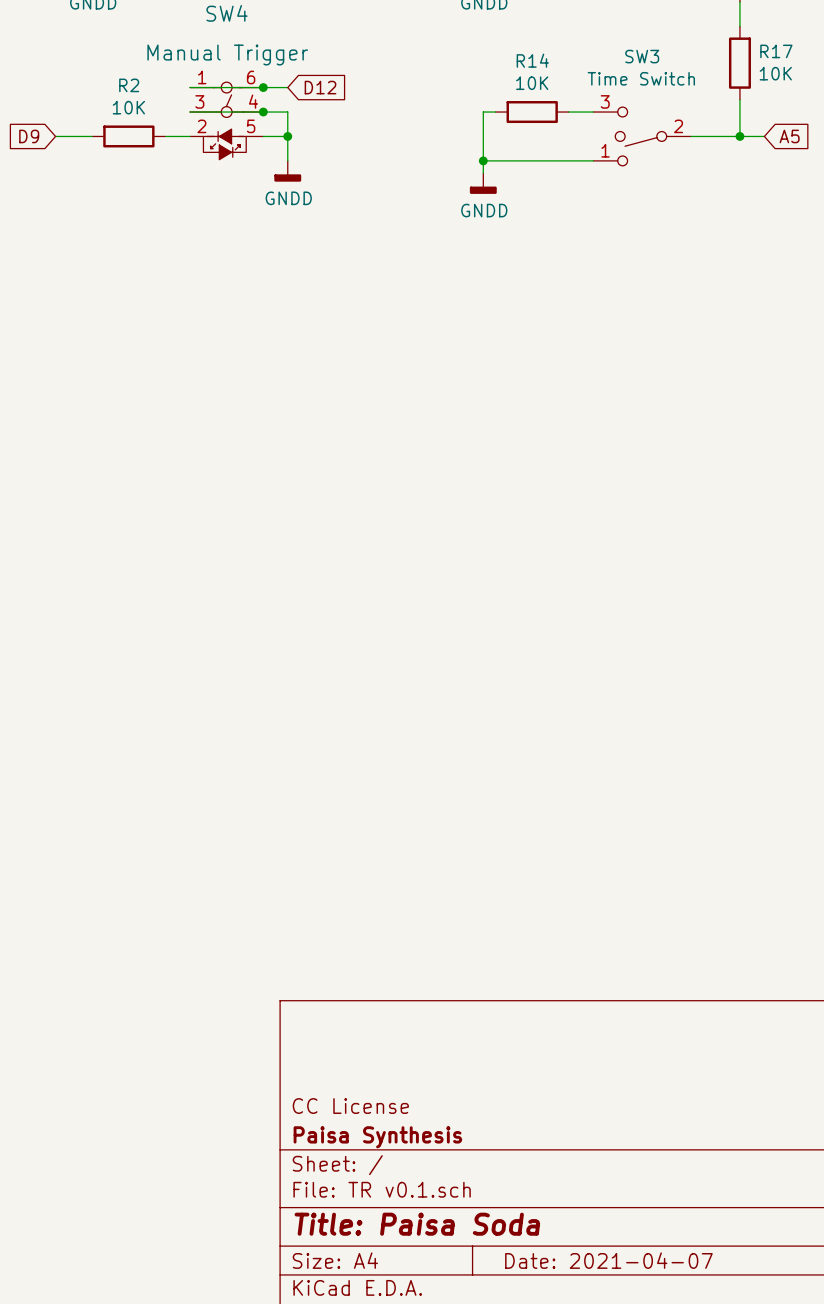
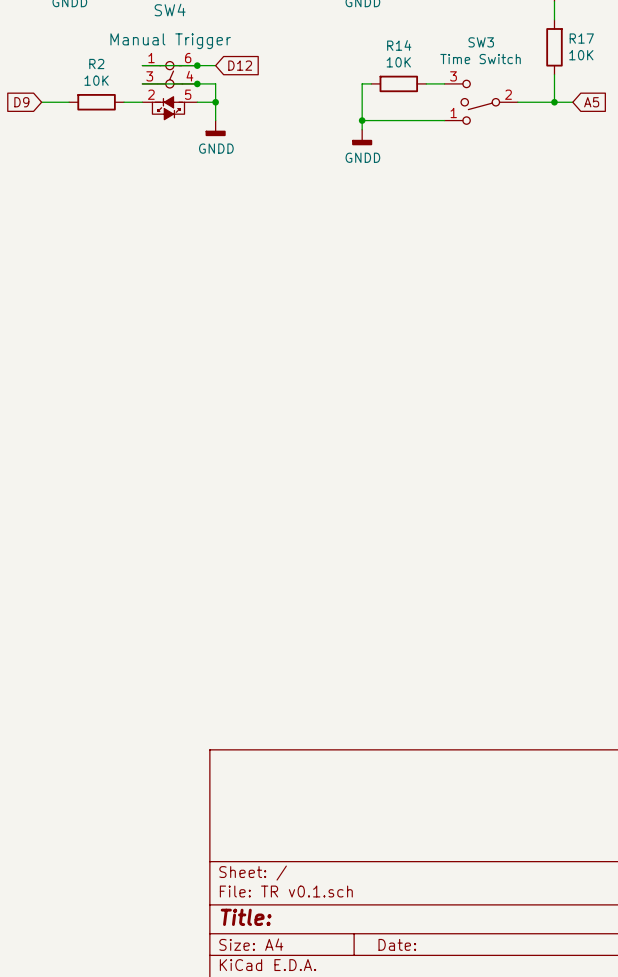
title block: CC License (350, 1106) -> none
title block: Paisa Synthesis (377, 1137) -> none
title block: Title: Paisa Soda (417, 1224) -> Title: (246, 917)
title block: Date: 2021-04-07 (608, 1260) -> Date: (397, 944)

